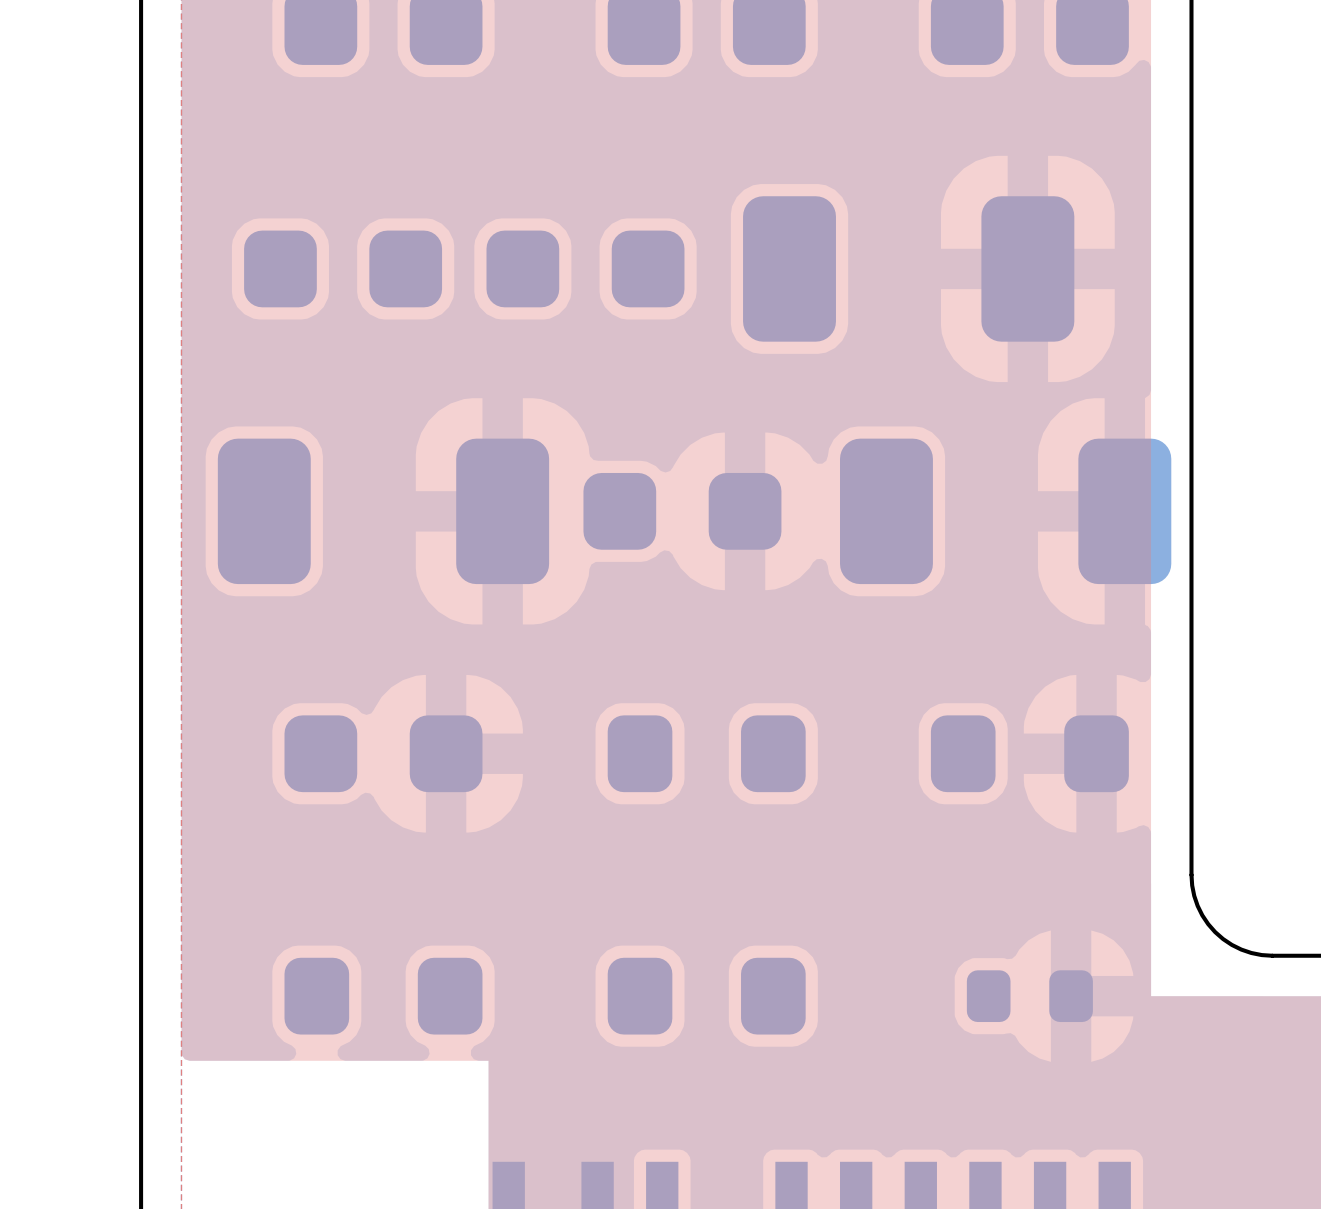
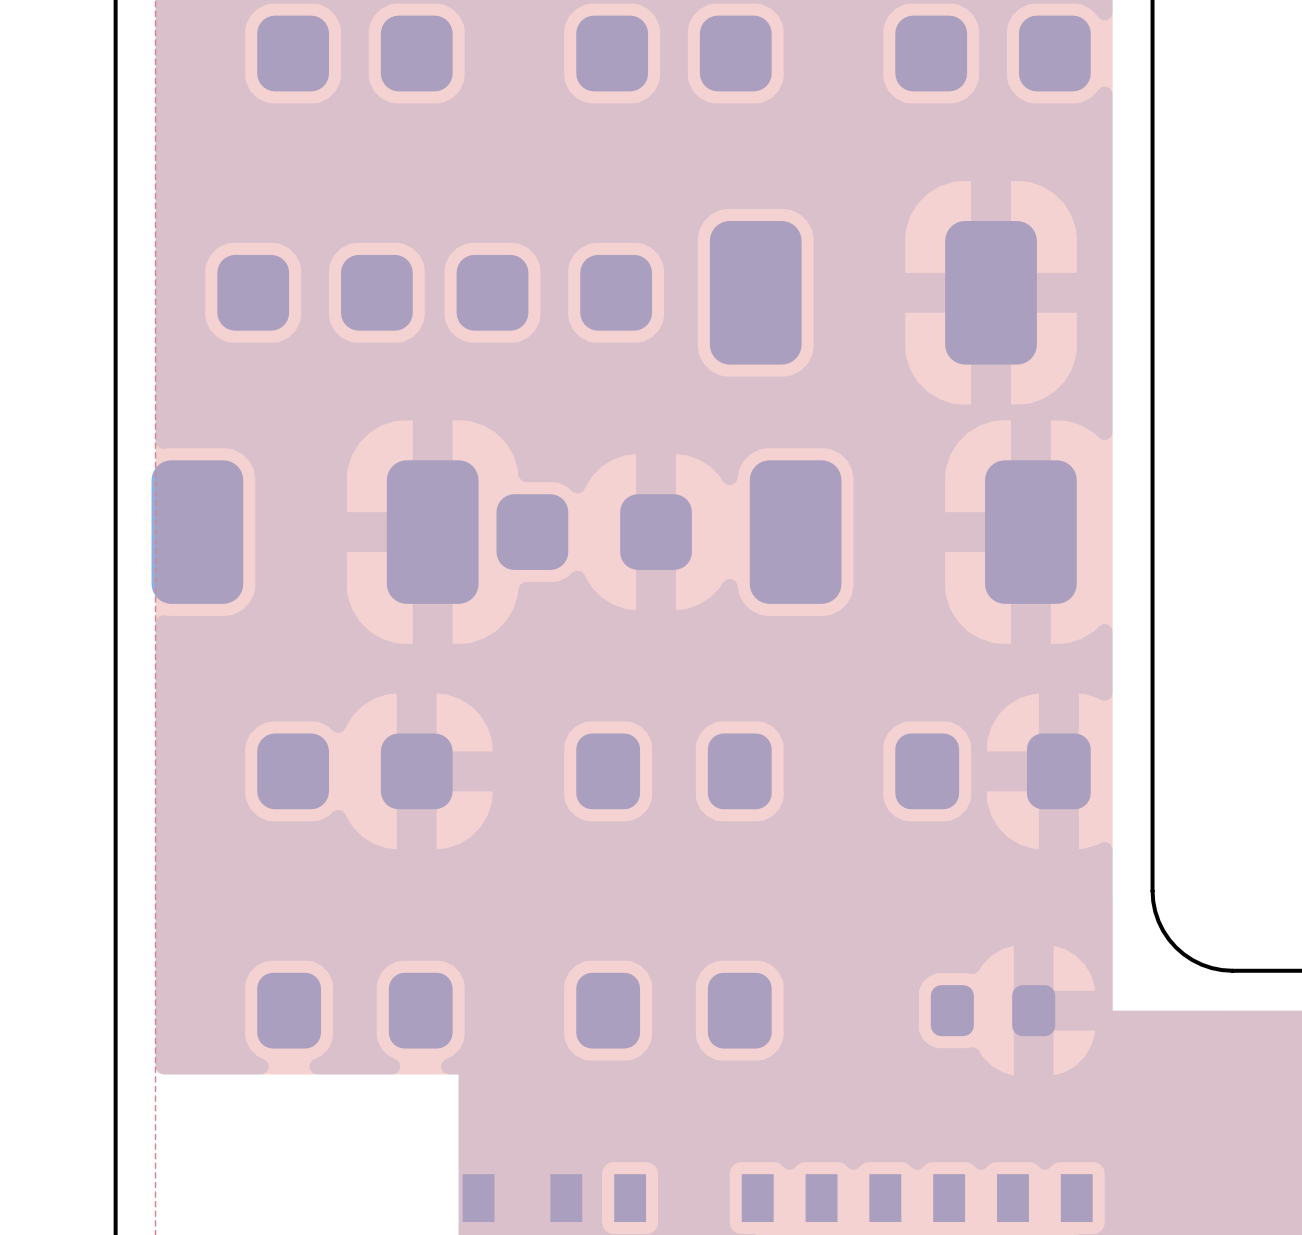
part position: (383, 511) -> (315, 532)
part position: (682, 511) -> (594, 532)
part position: (1005, 511) -> (913, 532)

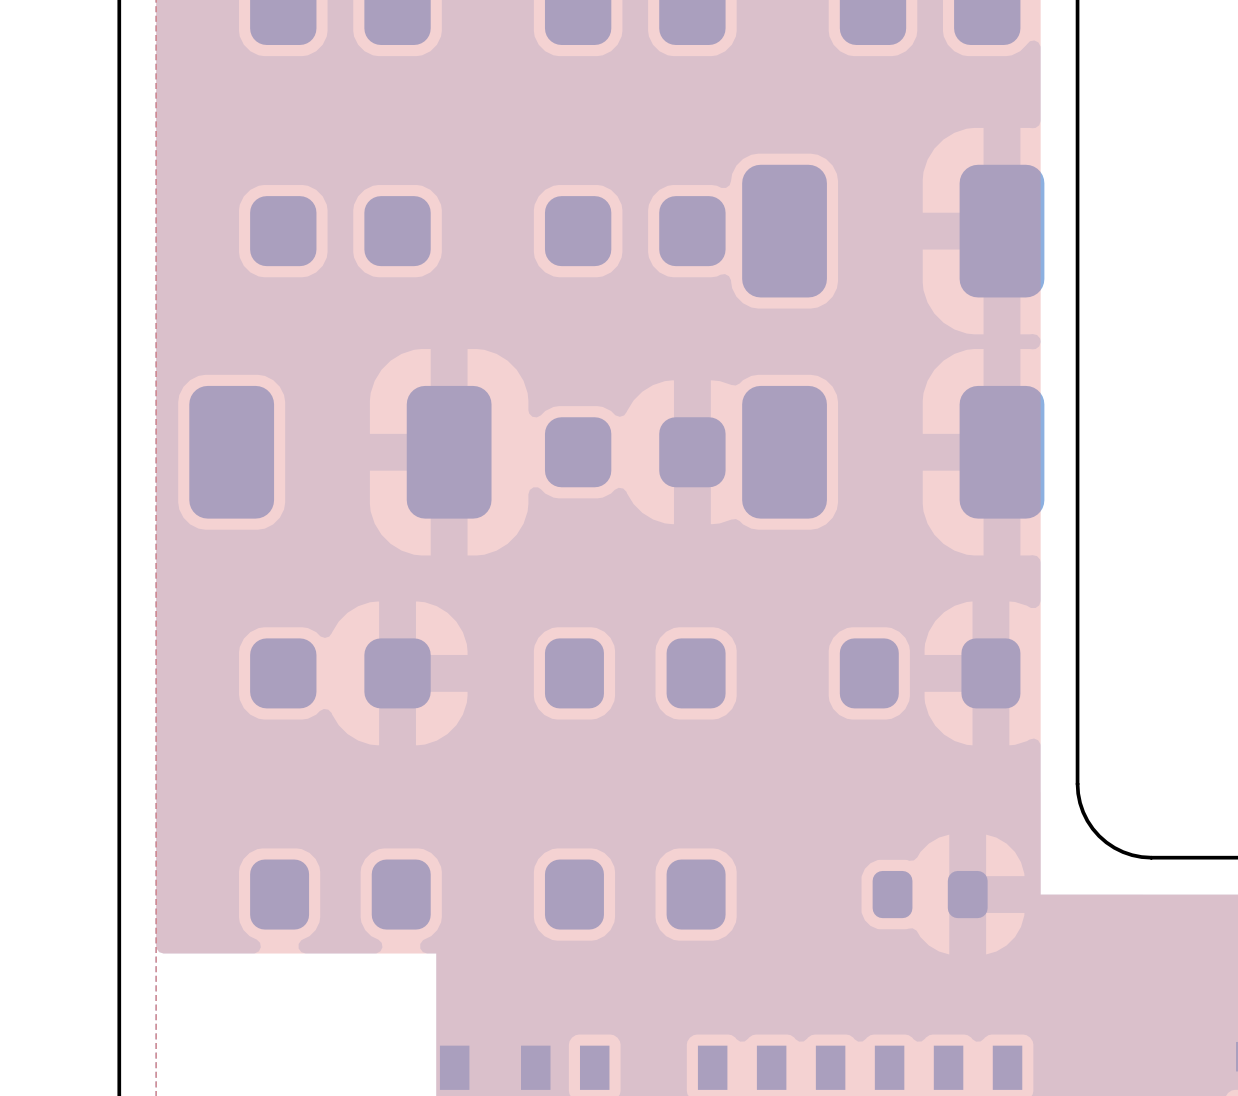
part position: (315, 292) -> (340, 231)
part position: (554, 292) -> (635, 231)
part position: (873, 292) -> (893, 231)
part position: (315, 532) -> (340, 452)
part position: (594, 532) -> (635, 452)
part position: (913, 532) -> (893, 452)

